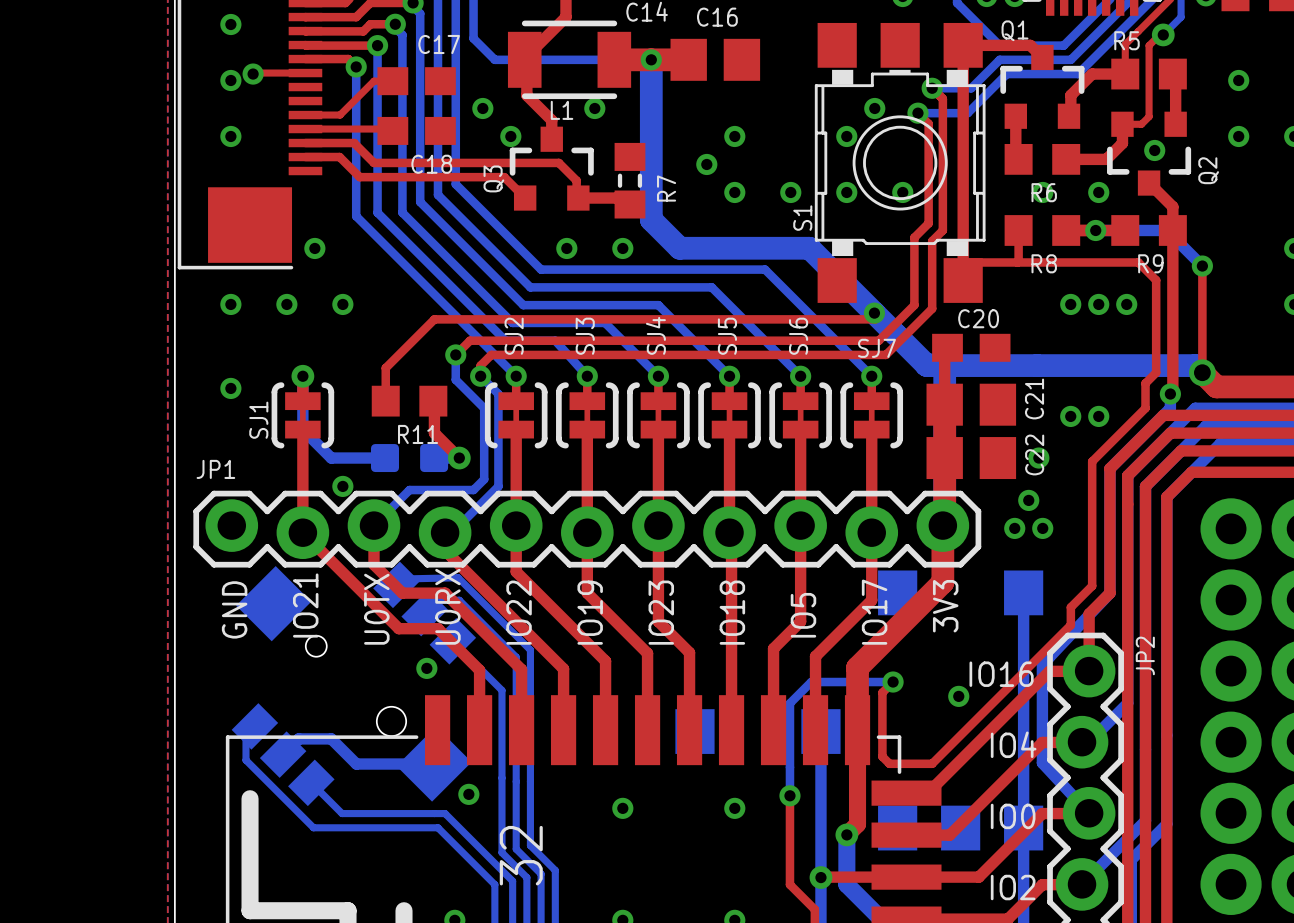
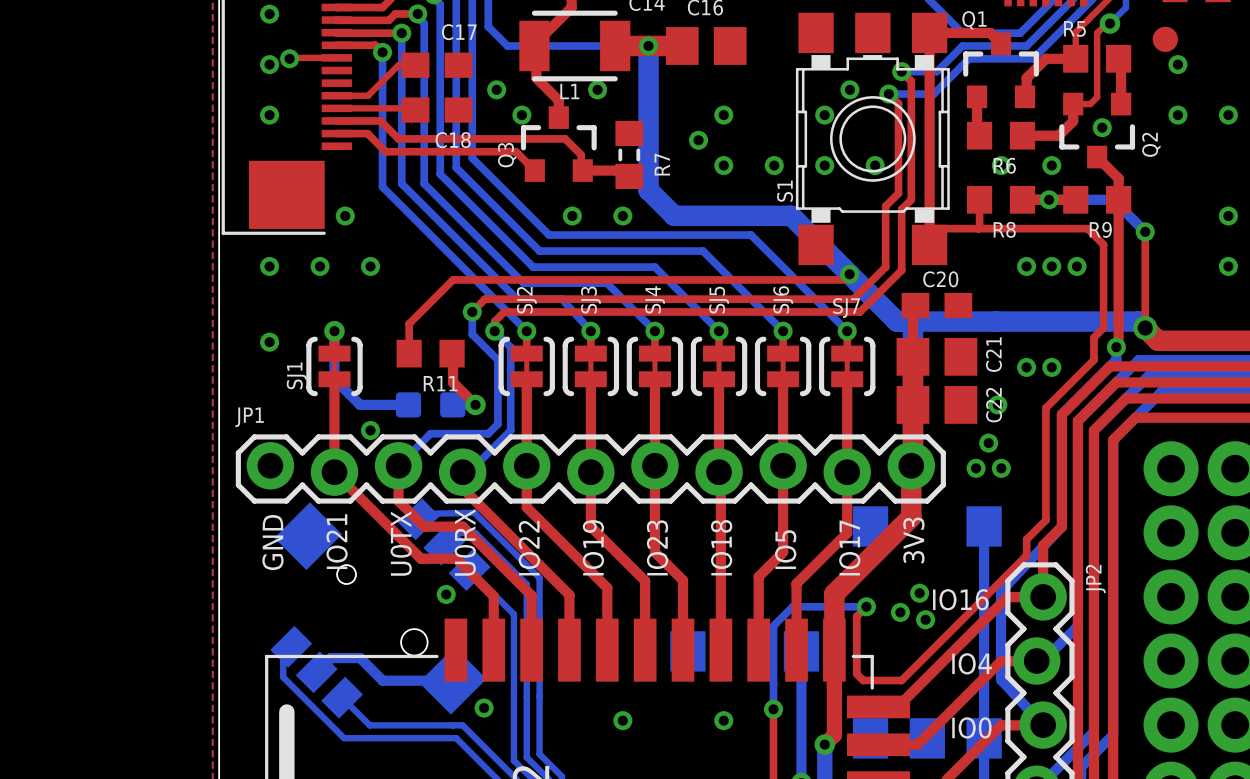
part: none -> (1165, 39)
via: none -> (919, 593)
via: none -> (900, 612)

